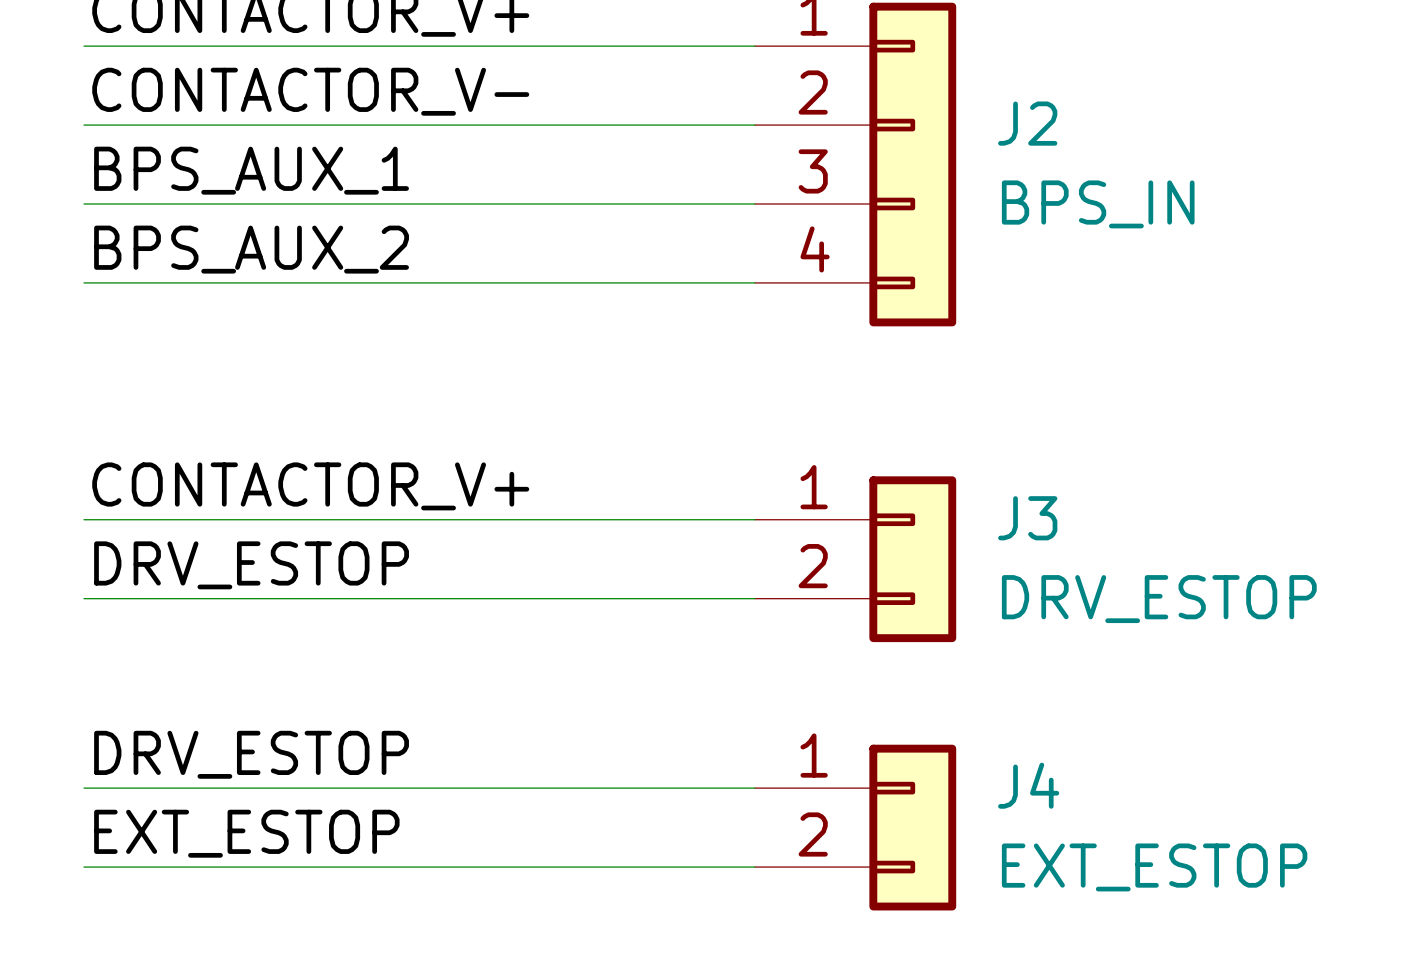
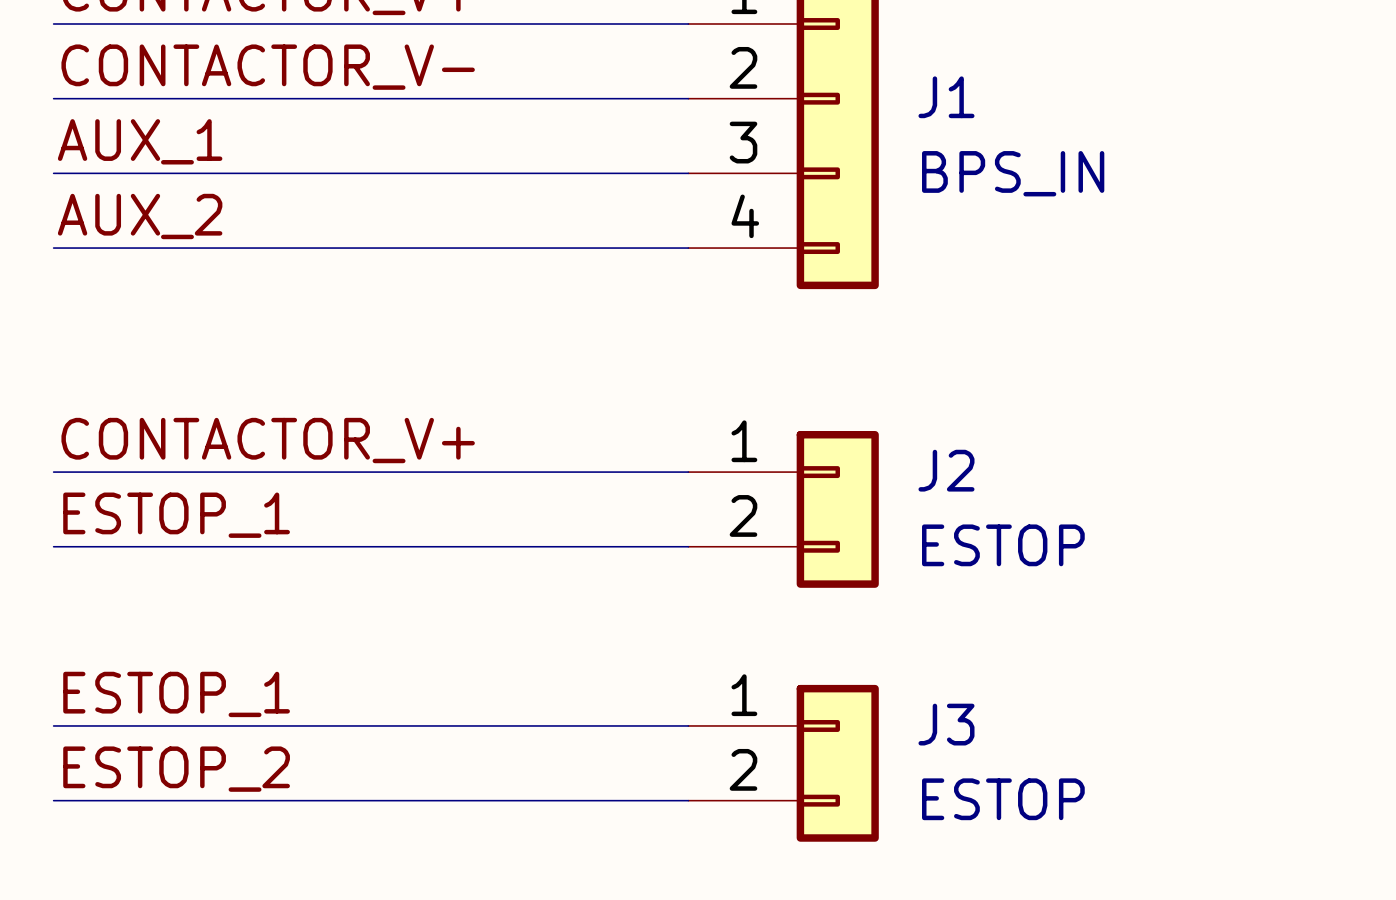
J2 name: J2 (1027, 123) -> J1 (946, 97)
label: BPS_AUX_1 (251, 170) -> AUX_1 (140, 141)
label: BPS_AUX_2 (251, 249) -> AUX_2 (140, 216)
J3 name: J3 (1027, 518) -> J2 (946, 470)
label: DRV_ESTOP (251, 565) -> ESTOP_1 (176, 515)
J3 value: DRV_ESTOP (1159, 599) -> ESTOP (1003, 545)
label: DRV_ESTOP (251, 754) -> ESTOP_1 (176, 694)
J4 name: J4 (1028, 785) -> J3 (946, 724)
label: EXT_ESTOP (246, 833) -> ESTOP_2 (176, 769)
J4 value: EXT_ESTOP (1154, 867) -> ESTOP (1003, 799)

